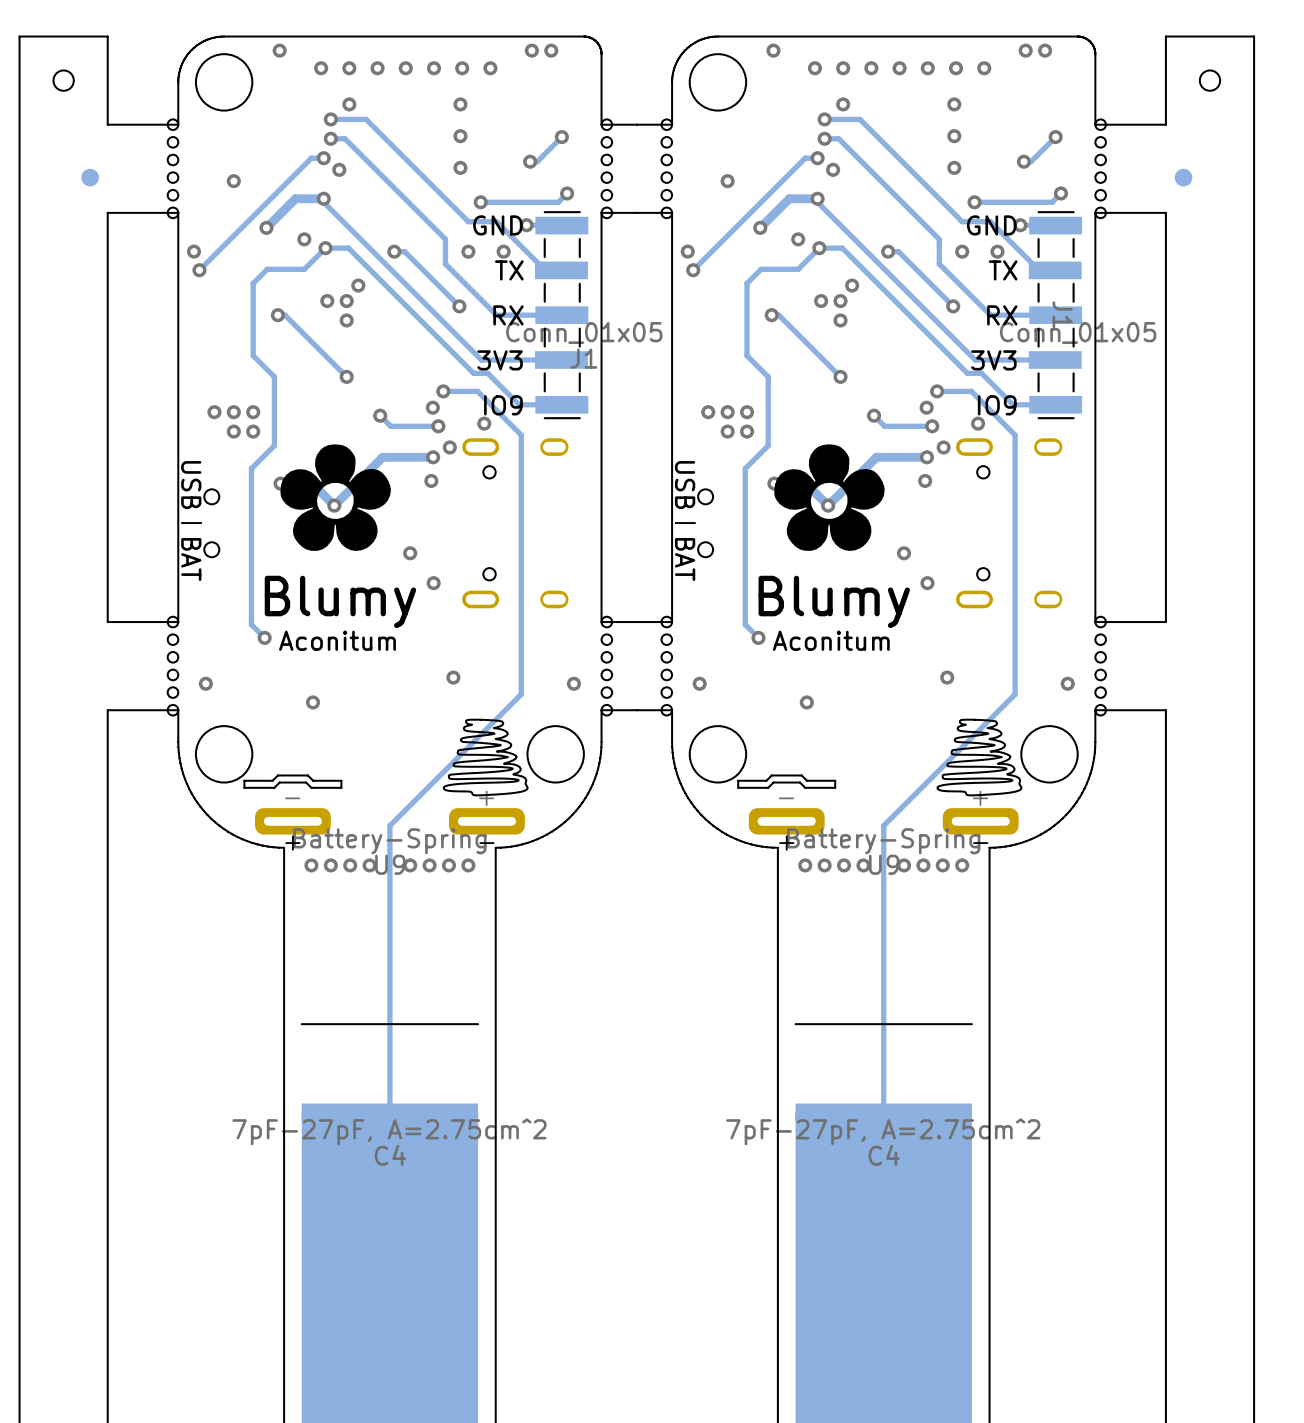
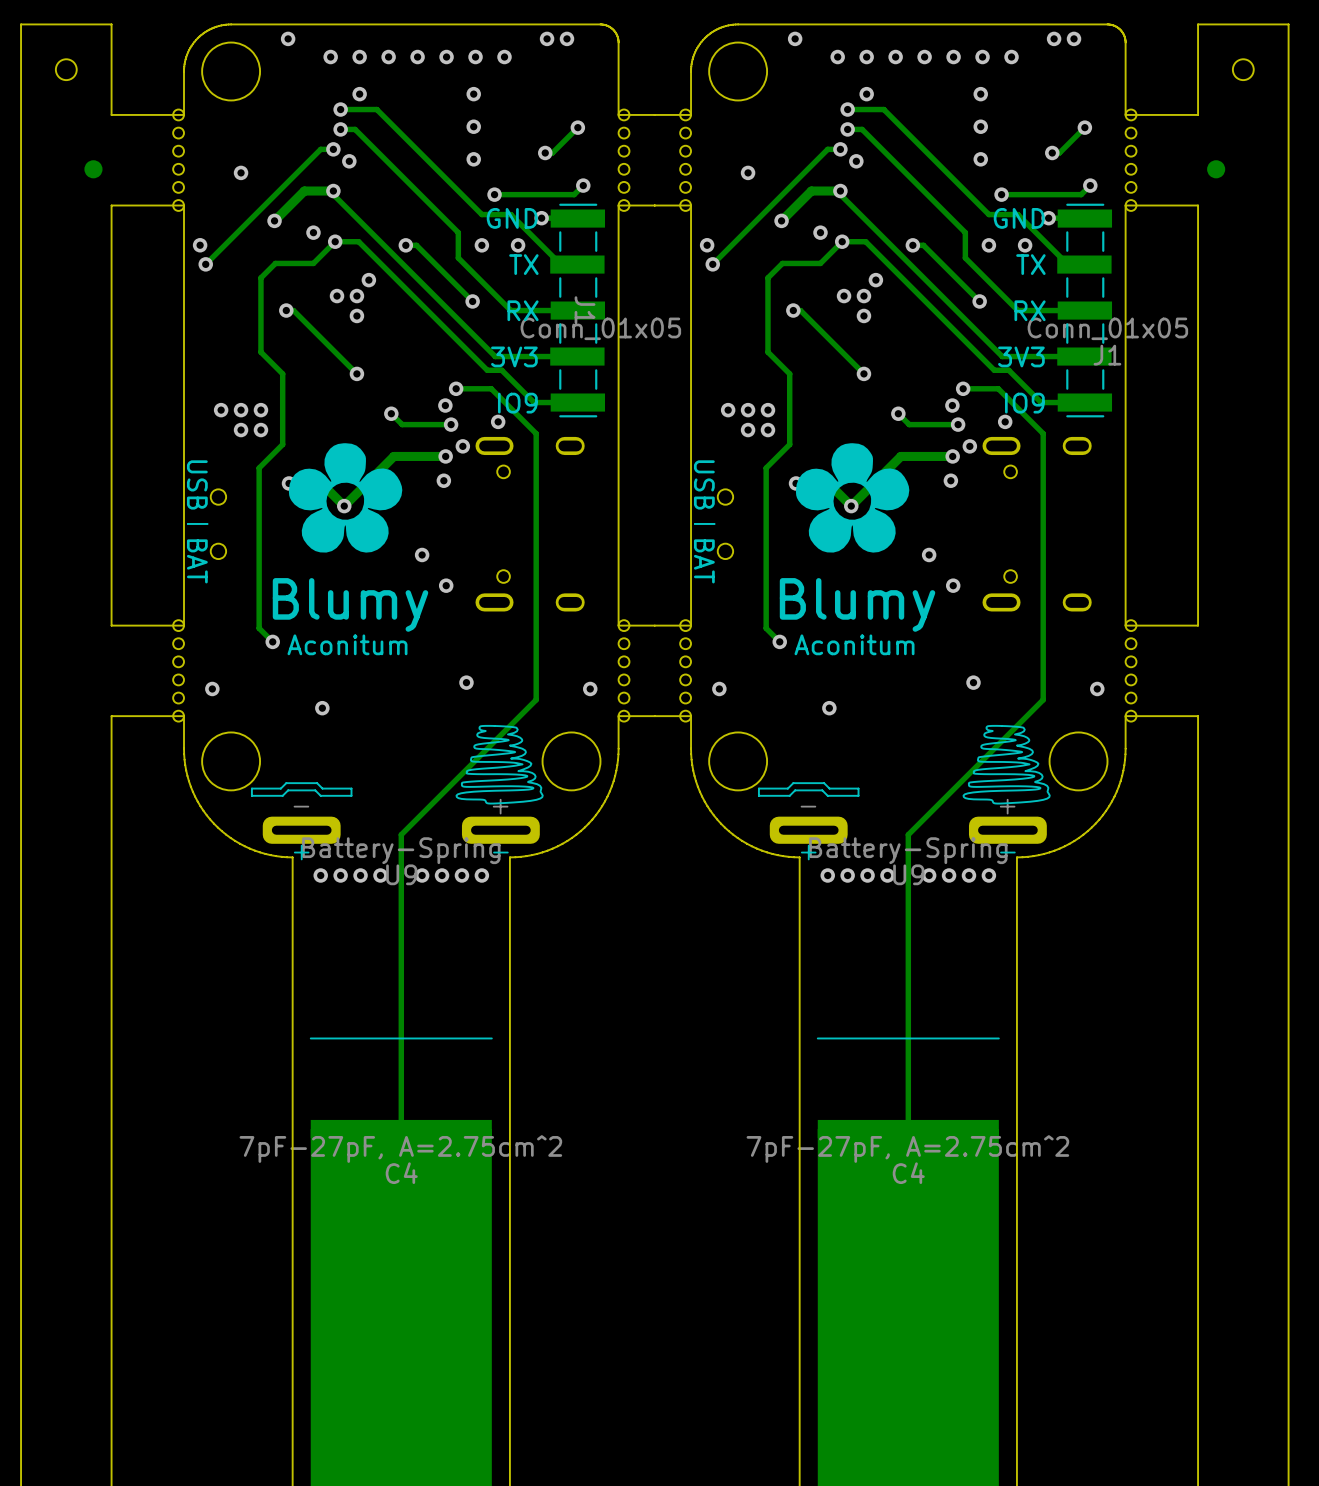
J1 name rotation: 0° (1062, 314) -> 90° counterclockwise (1107, 355)
J1 name position: J1 (1062, 314) -> J1 (1107, 355)
J1 name rotation: 0° (583, 358) -> 90° clockwise (585, 310)
J1 name position: J1 (583, 358) -> J1 (585, 310)

